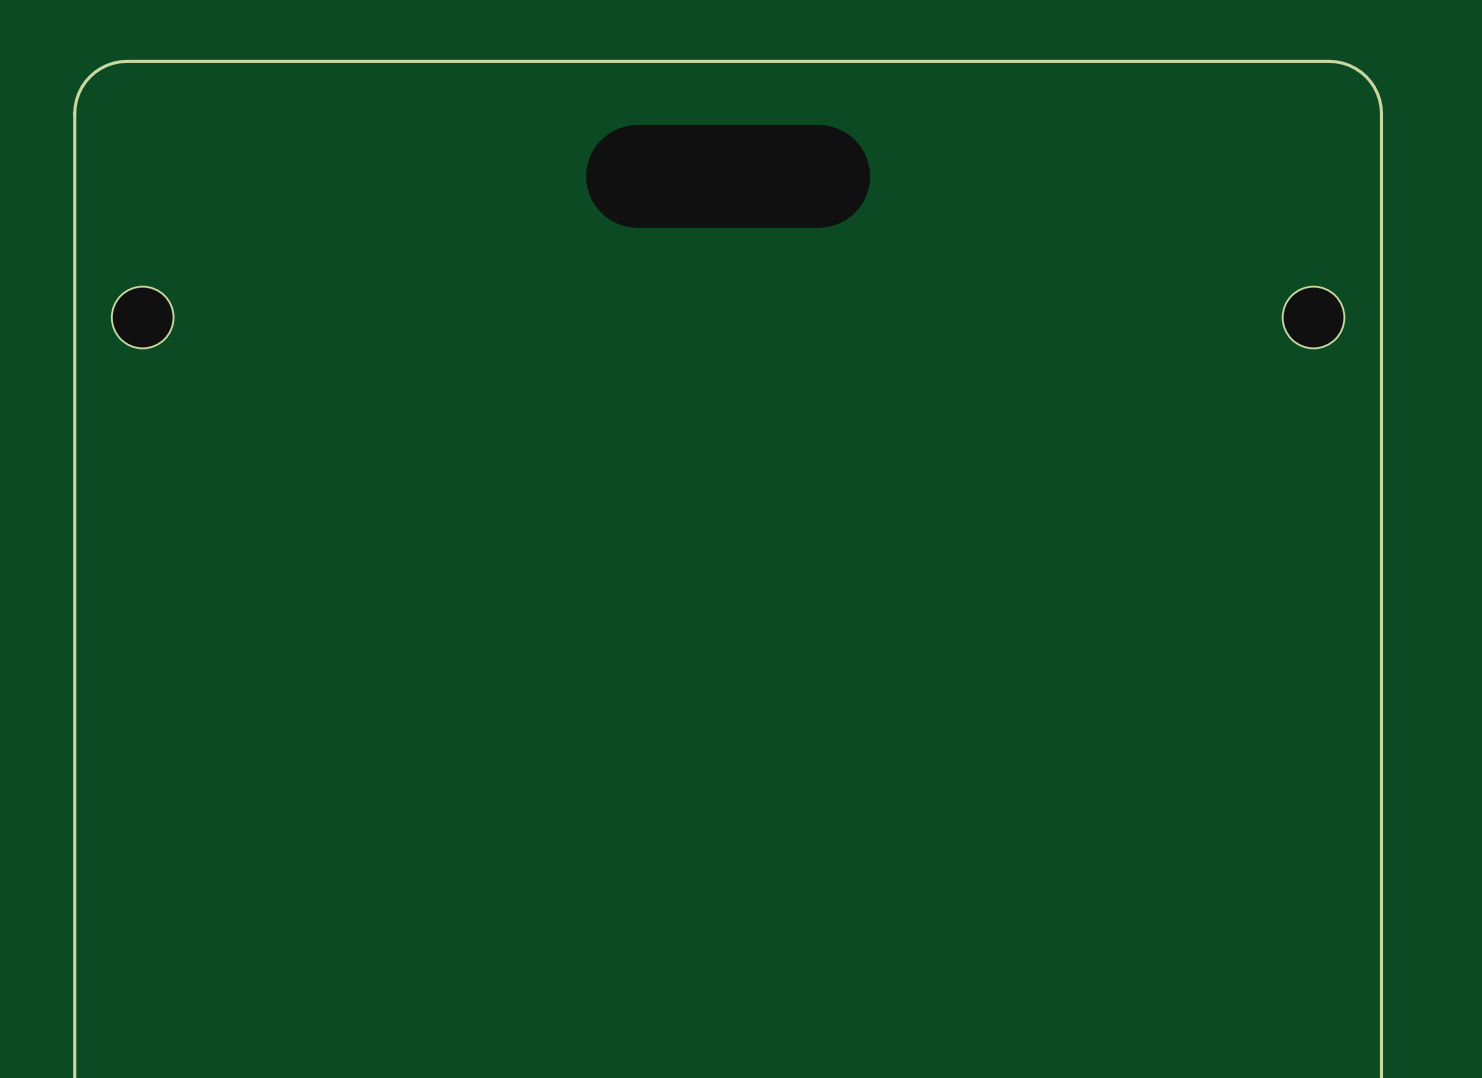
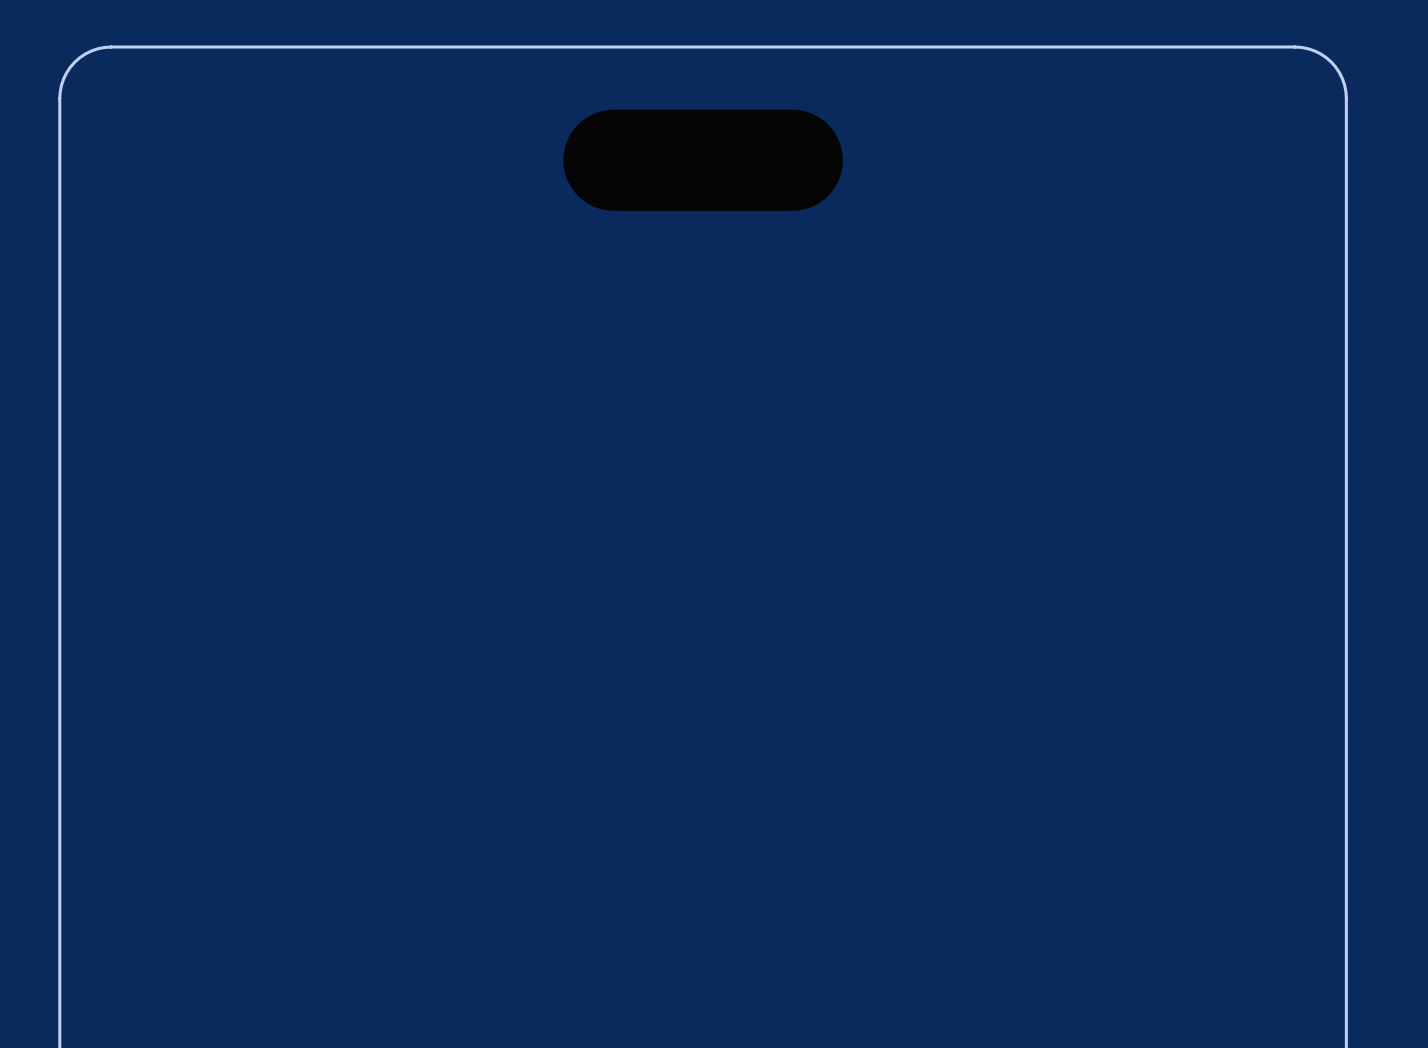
part: (142, 317) -> none
part: (1313, 317) -> none

